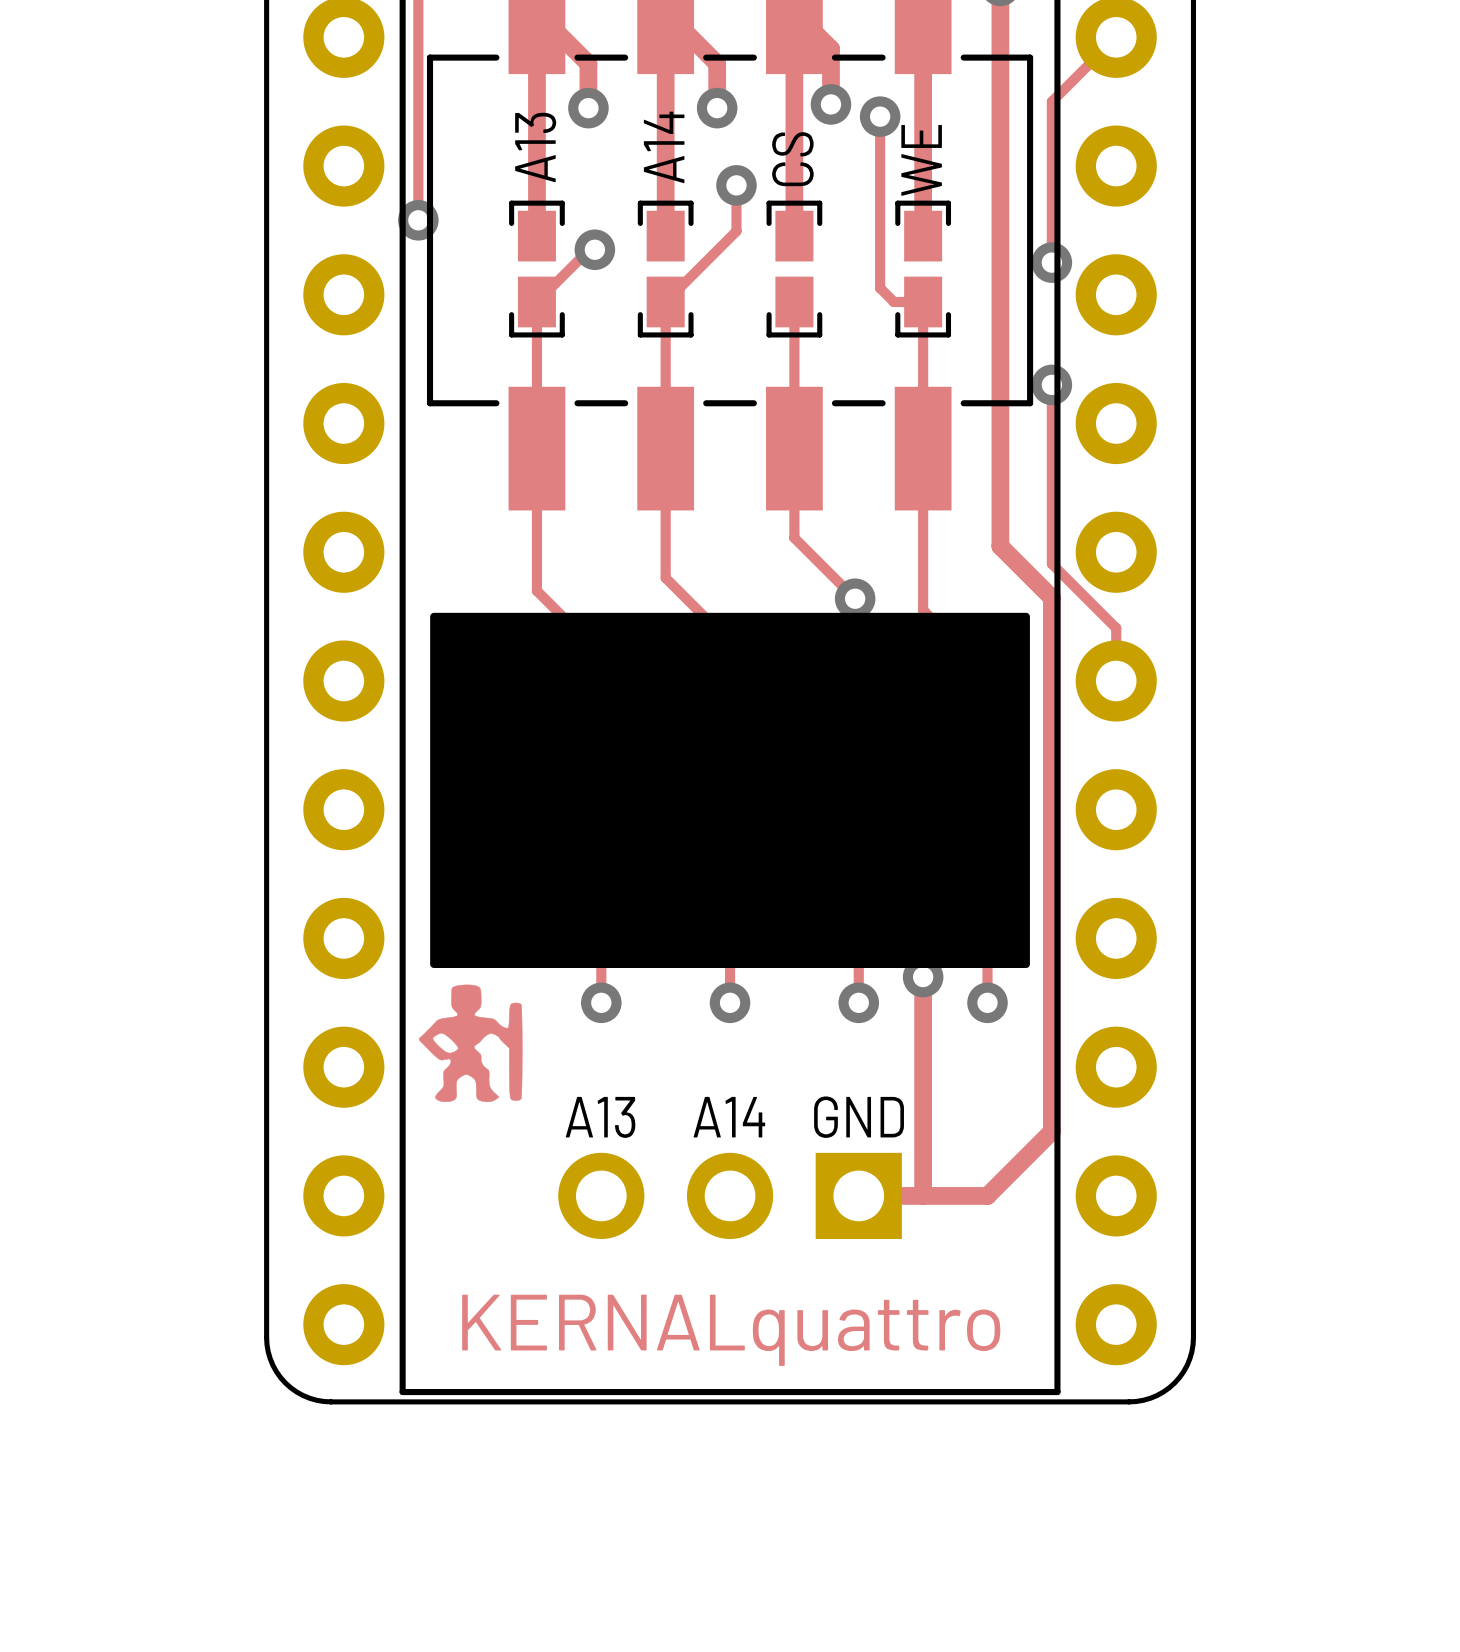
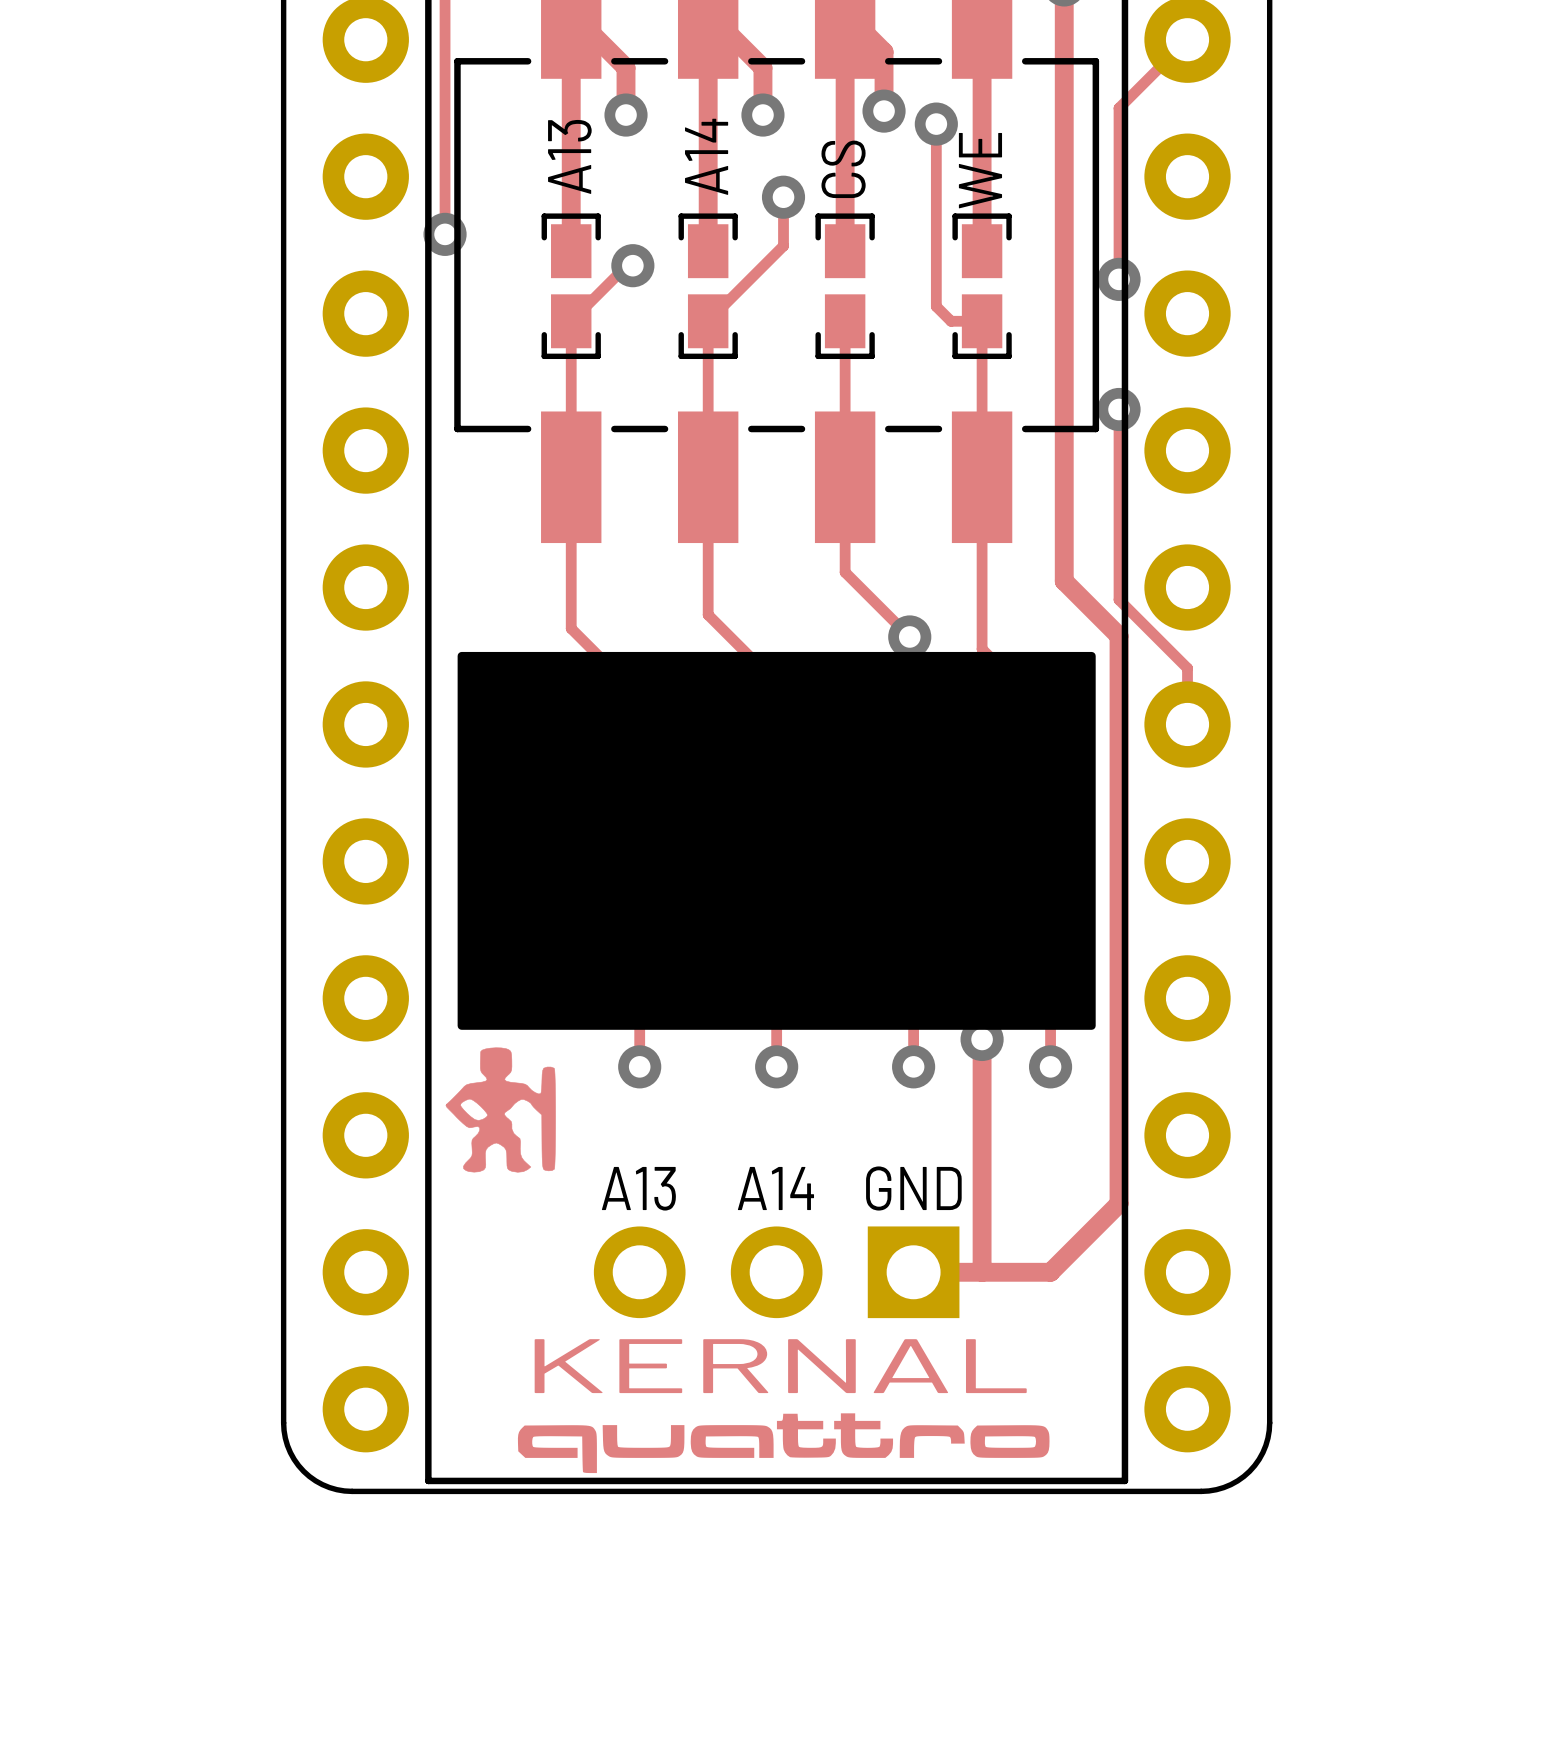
drawing: none -> [517, 1413, 1050, 1474]
text: KERNALquattro (731, 1330) -> KERNAL (780, 1366)

